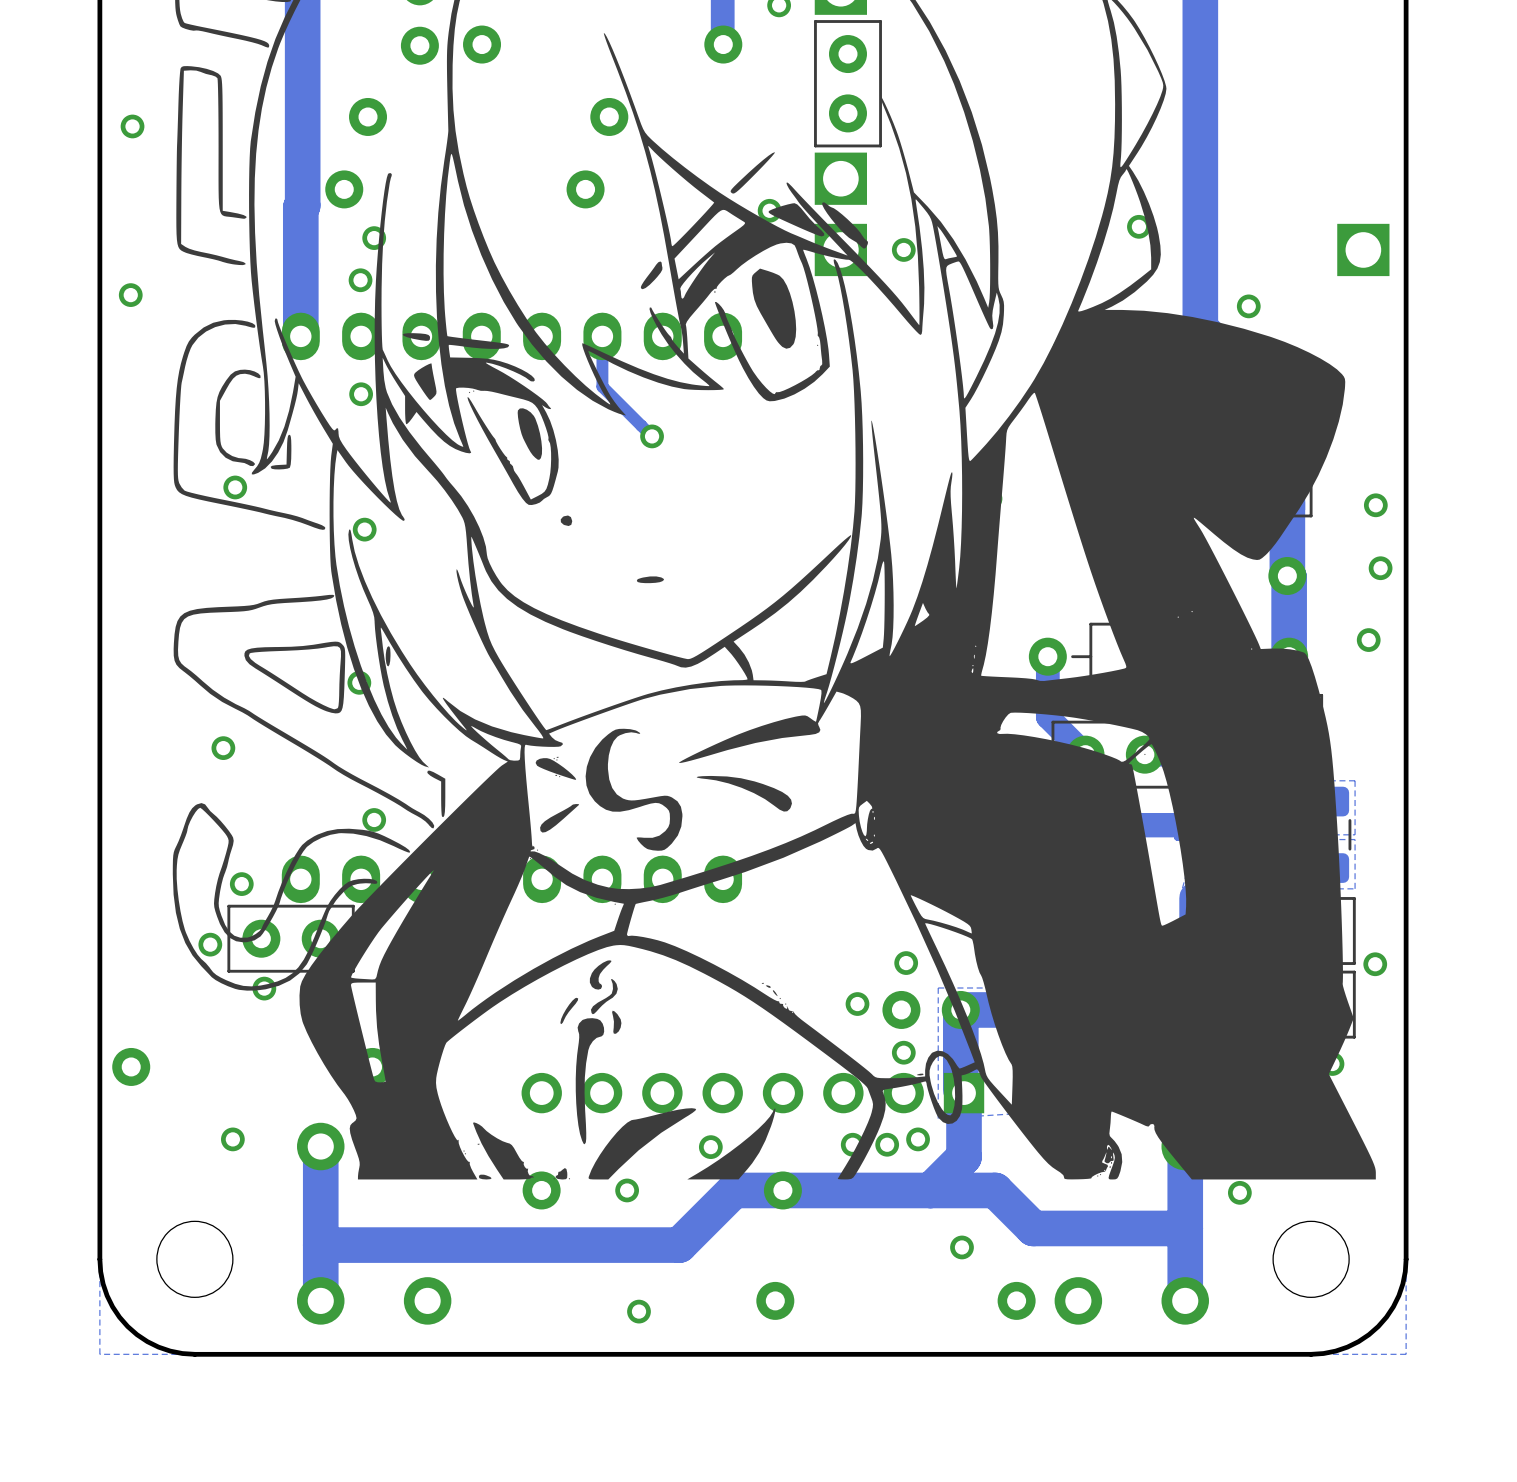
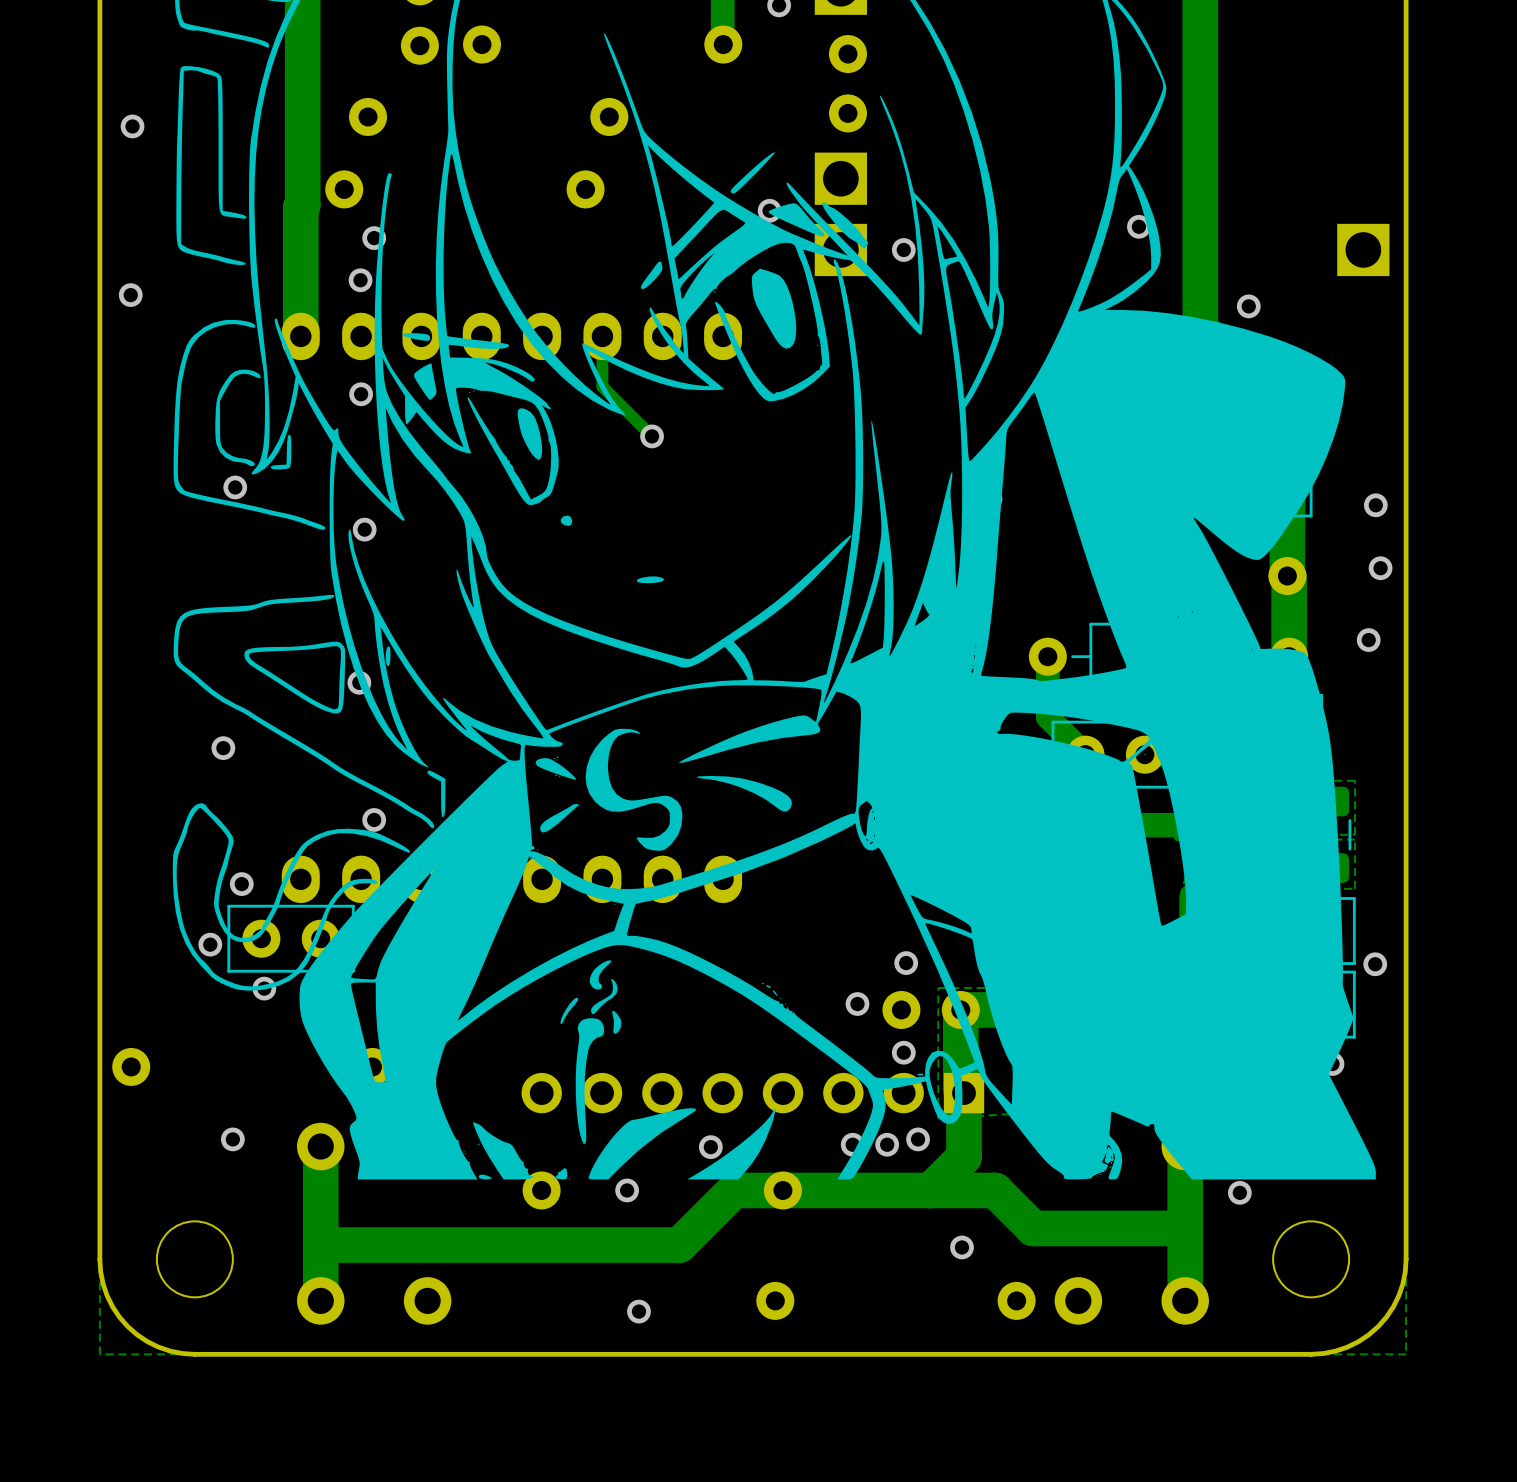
part side: bottom (847, 83) -> top (847, 83)

